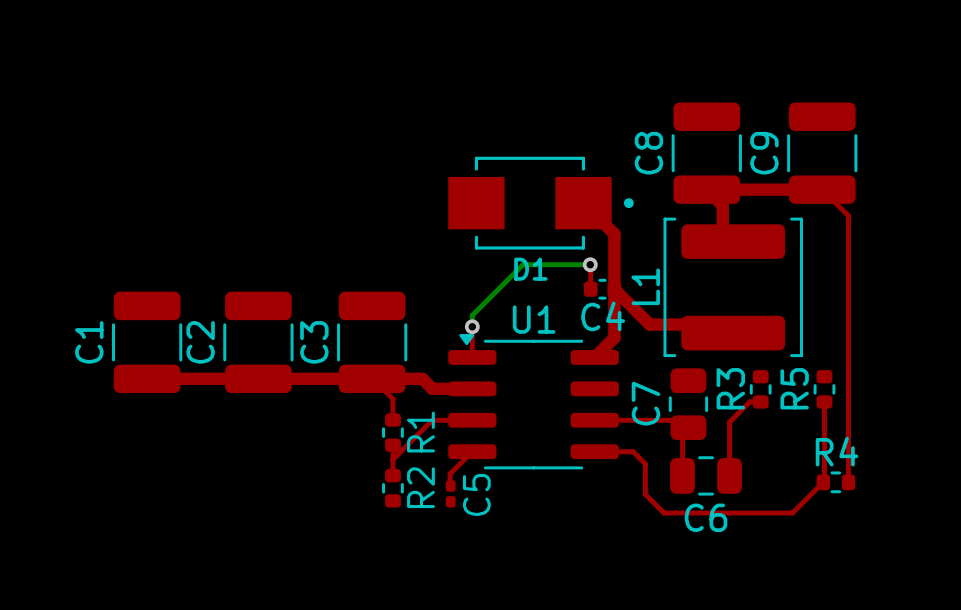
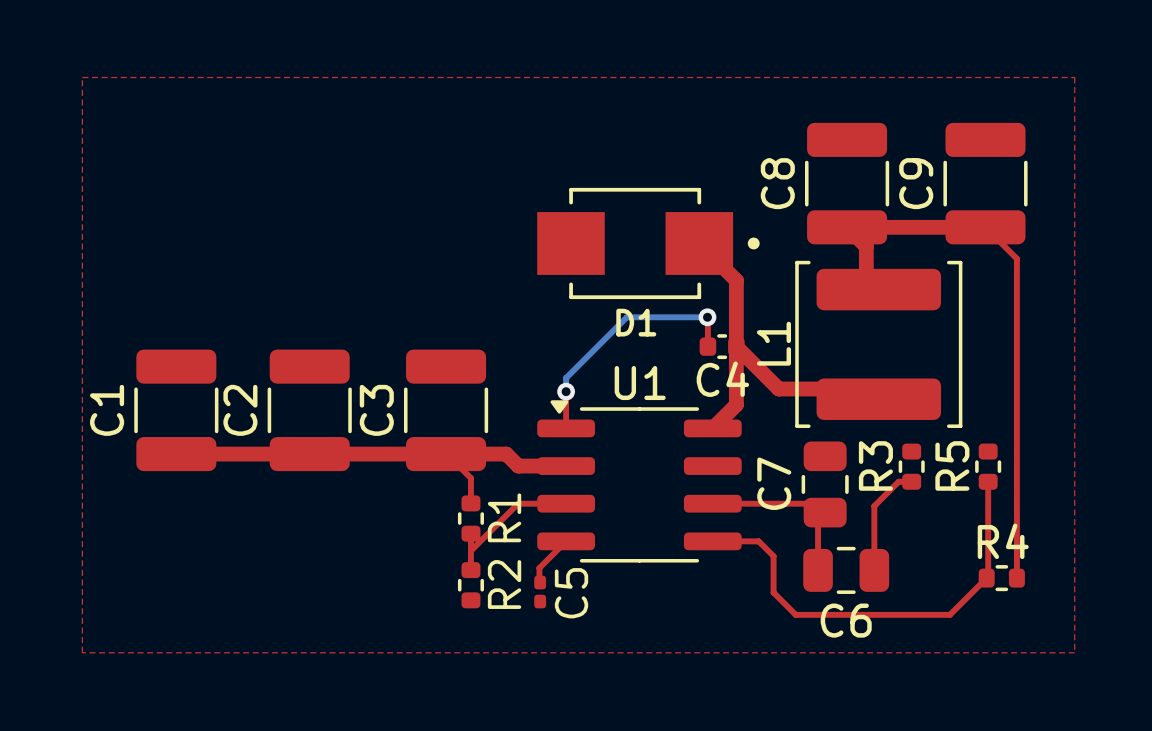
top zone outline: none -> (82, 652) (82, 77) (1074, 77) (1074, 652) (82, 652)

